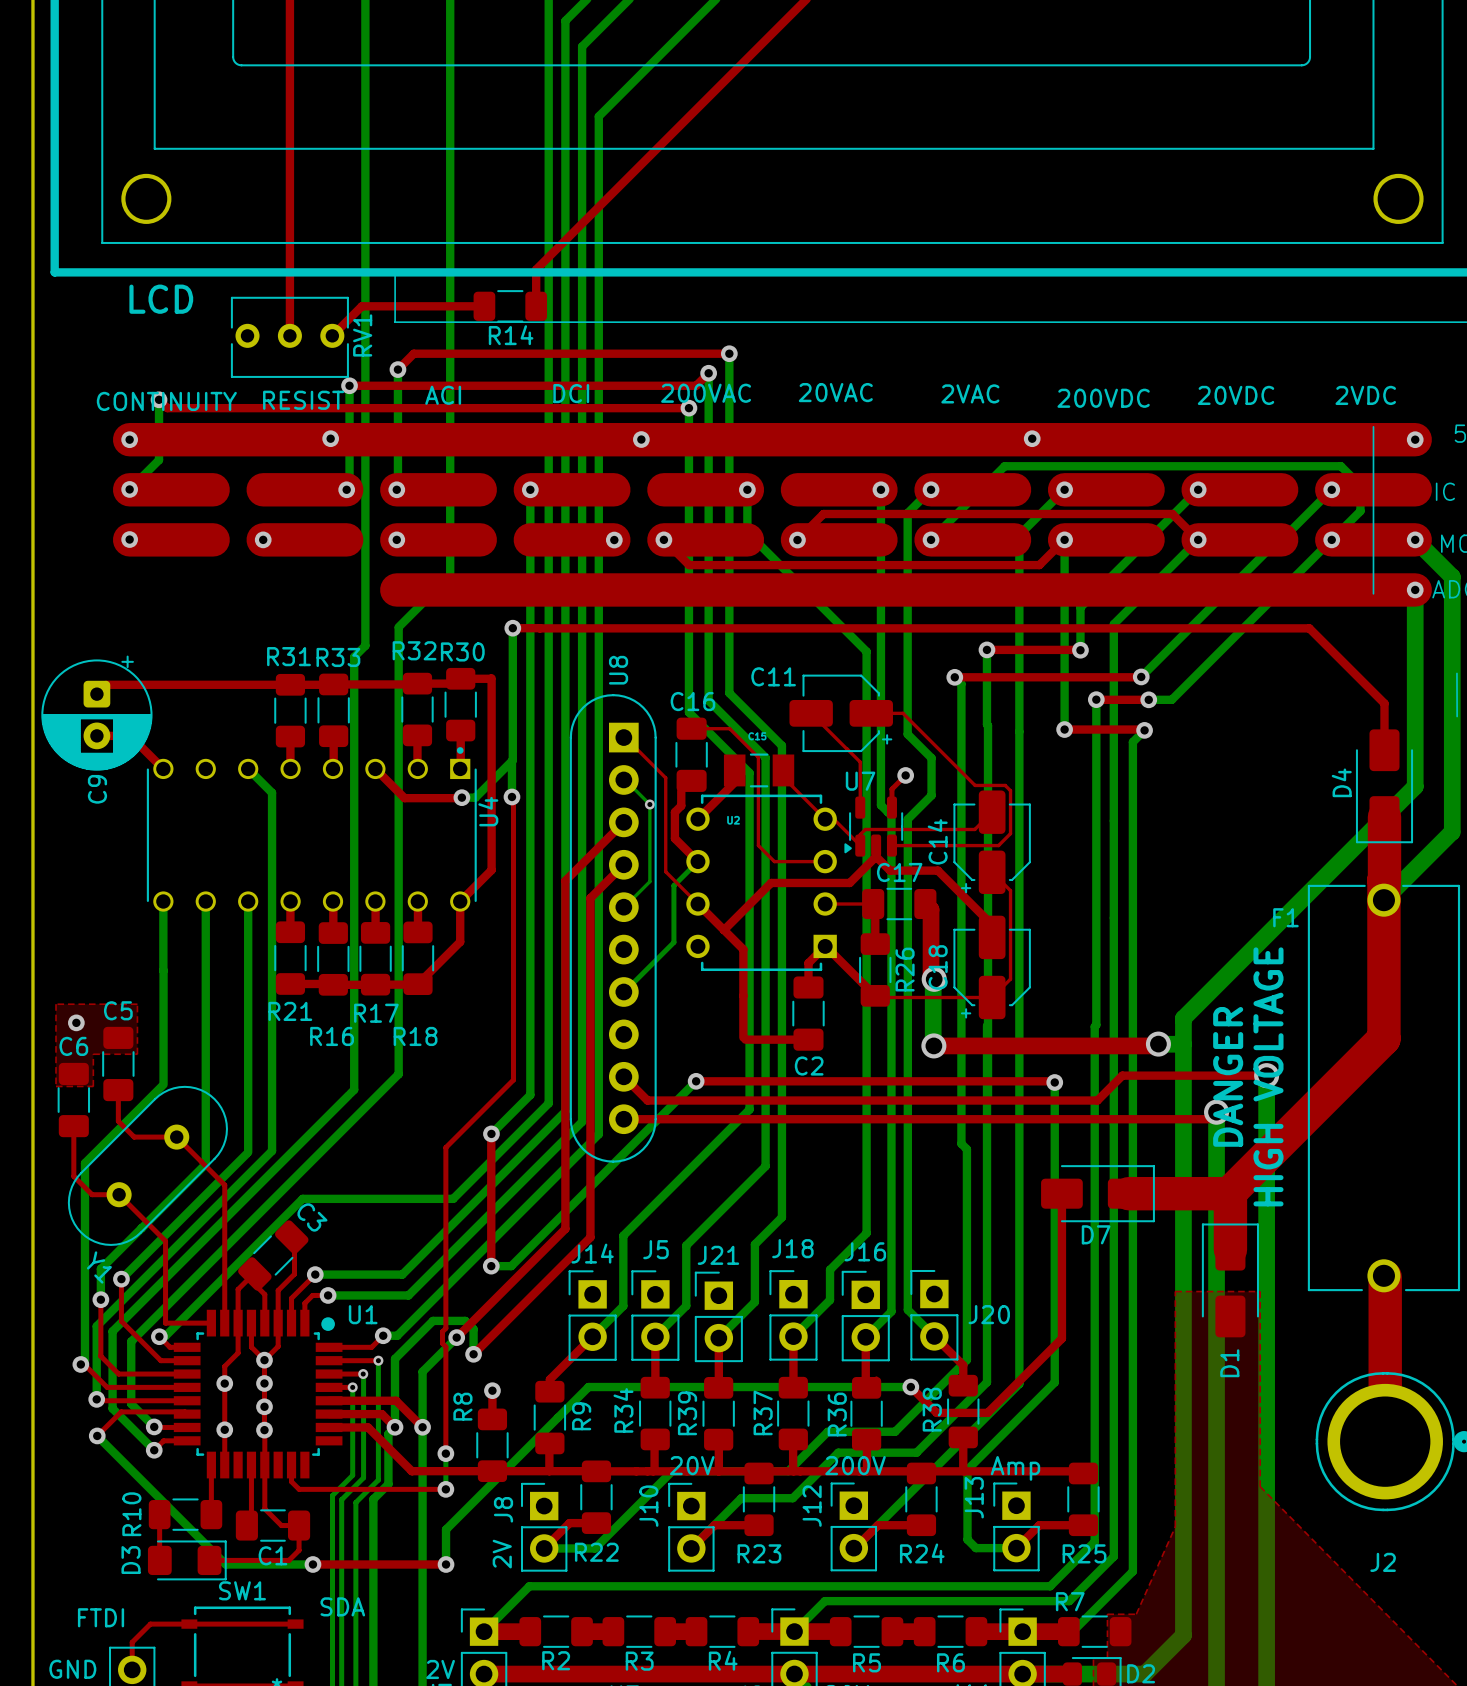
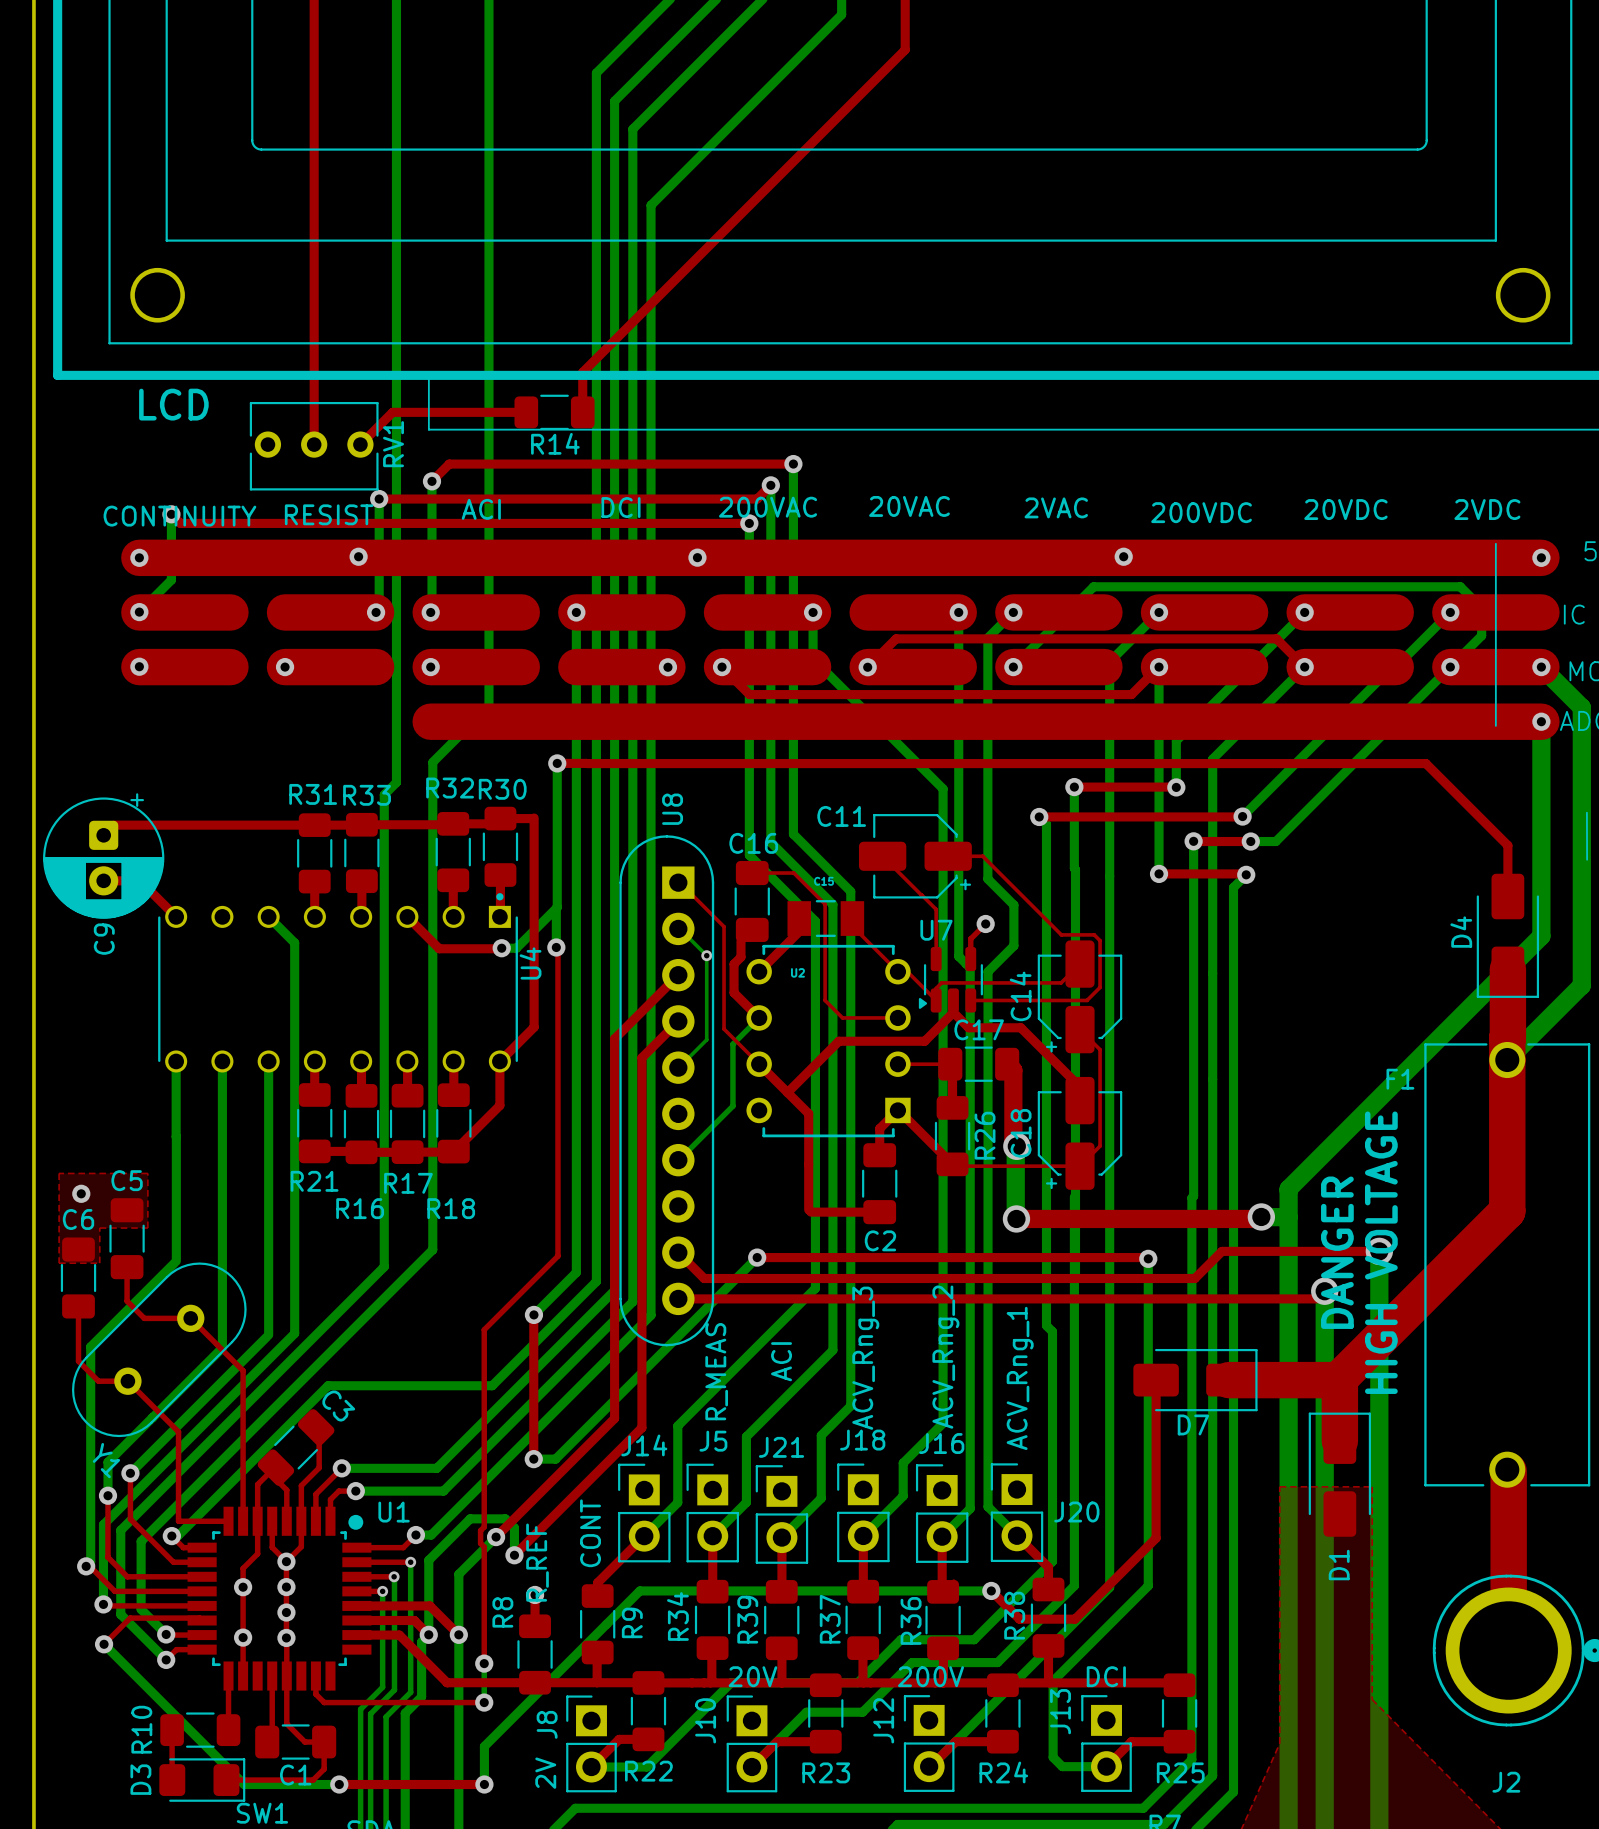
text: none -> ACV_Rng_2 (945, 1357)
text: none -> ACV_Rng_3 (865, 1358)
text: none -> ACI (781, 1361)
text: none -> R_MEAS (716, 1371)
text: none -> ACV_Rng_1 (1020, 1378)
text: none -> CONT (590, 1533)
text: none -> R_REF (537, 1562)
text: Amp (1015, 1468) -> DCI (1106, 1676)

